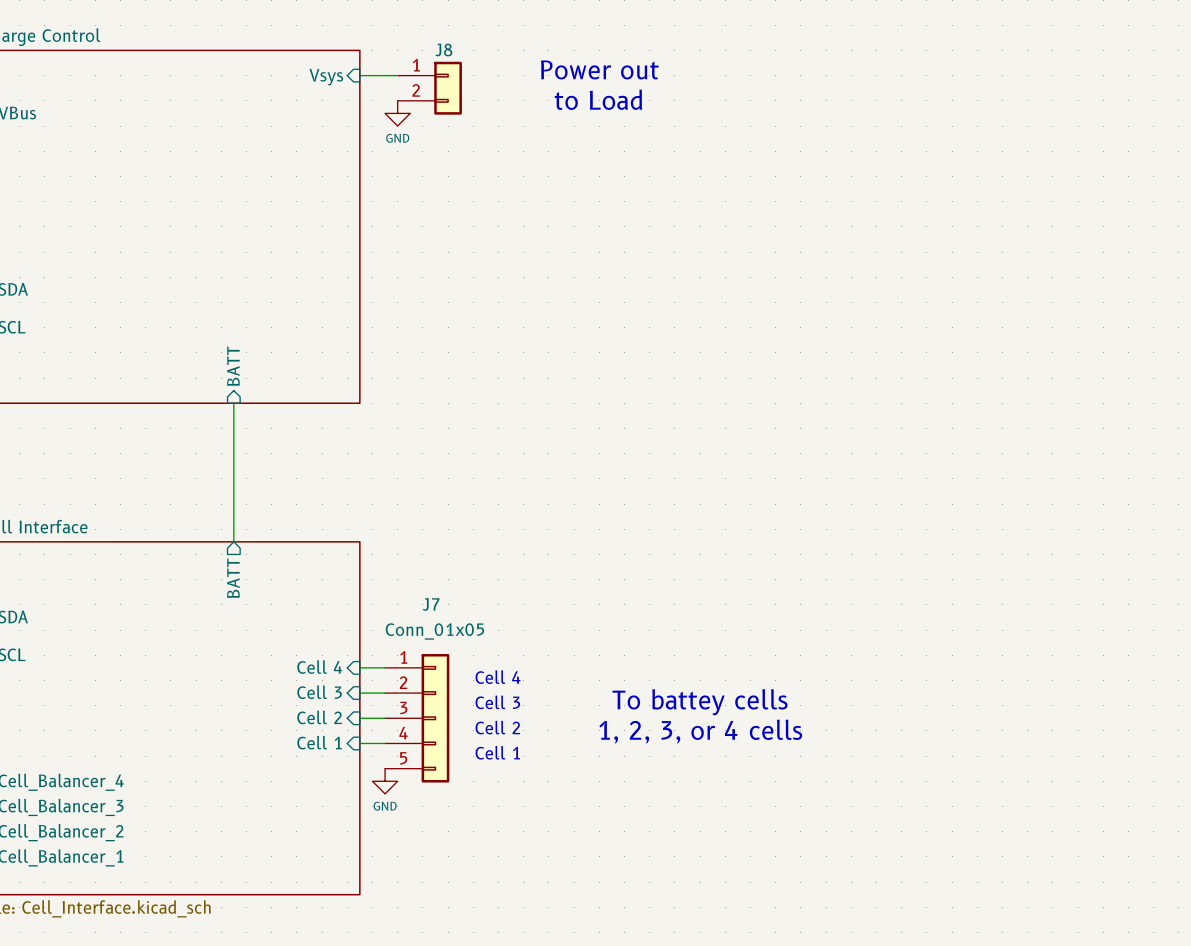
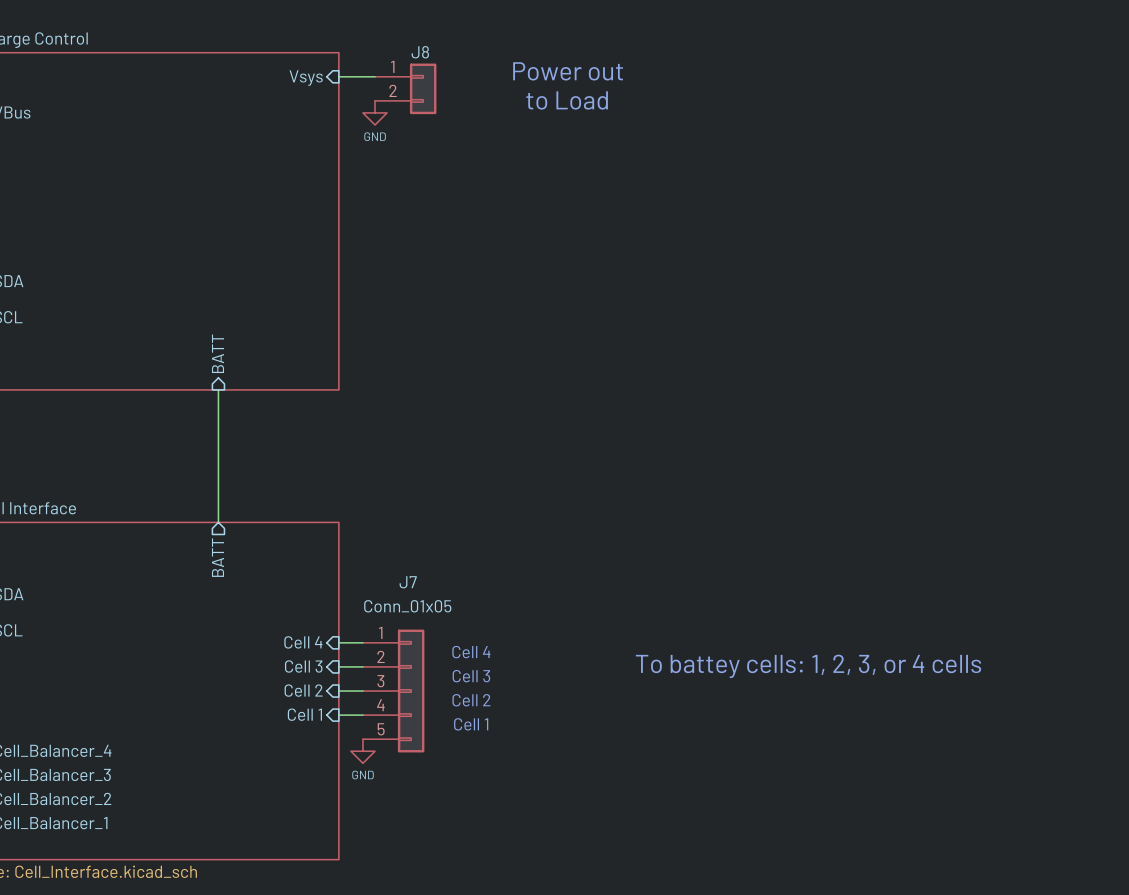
text: none -> To battey cells: 1, 2, 3, or 4 cells (808, 666)
text: To battey cells (699, 702) -> none
text: 1, 2, 3, or 4 cells (700, 731) -> none

